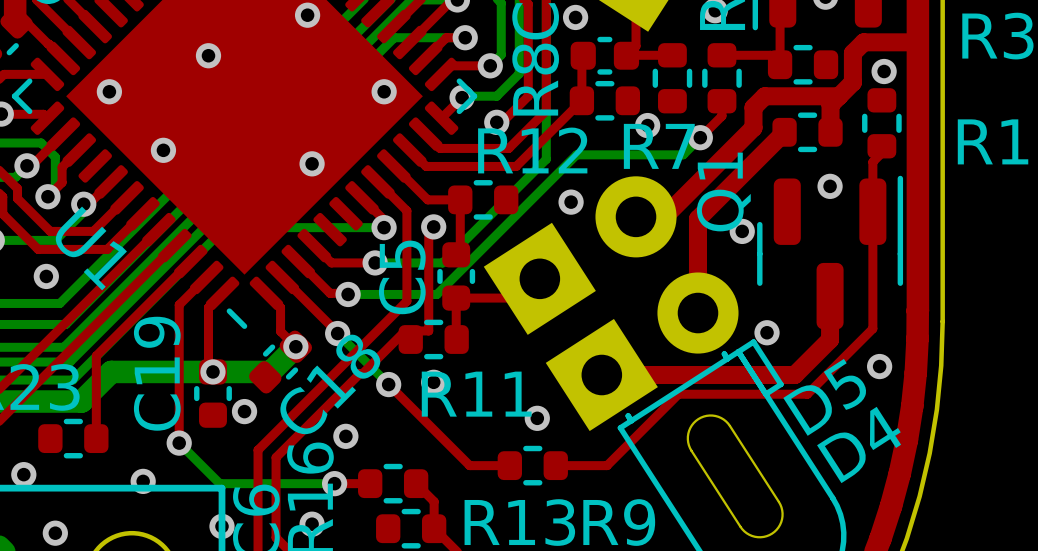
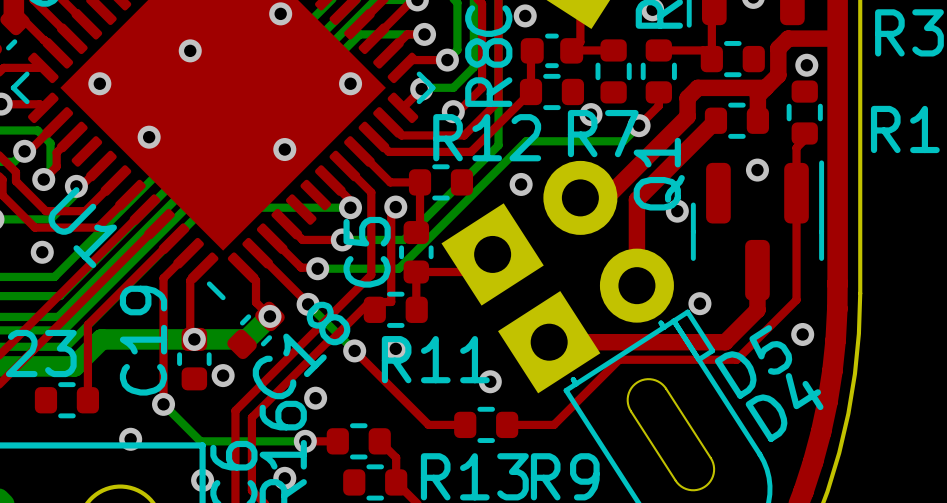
via: (23, 474) -> none
via: (55, 533) -> none

